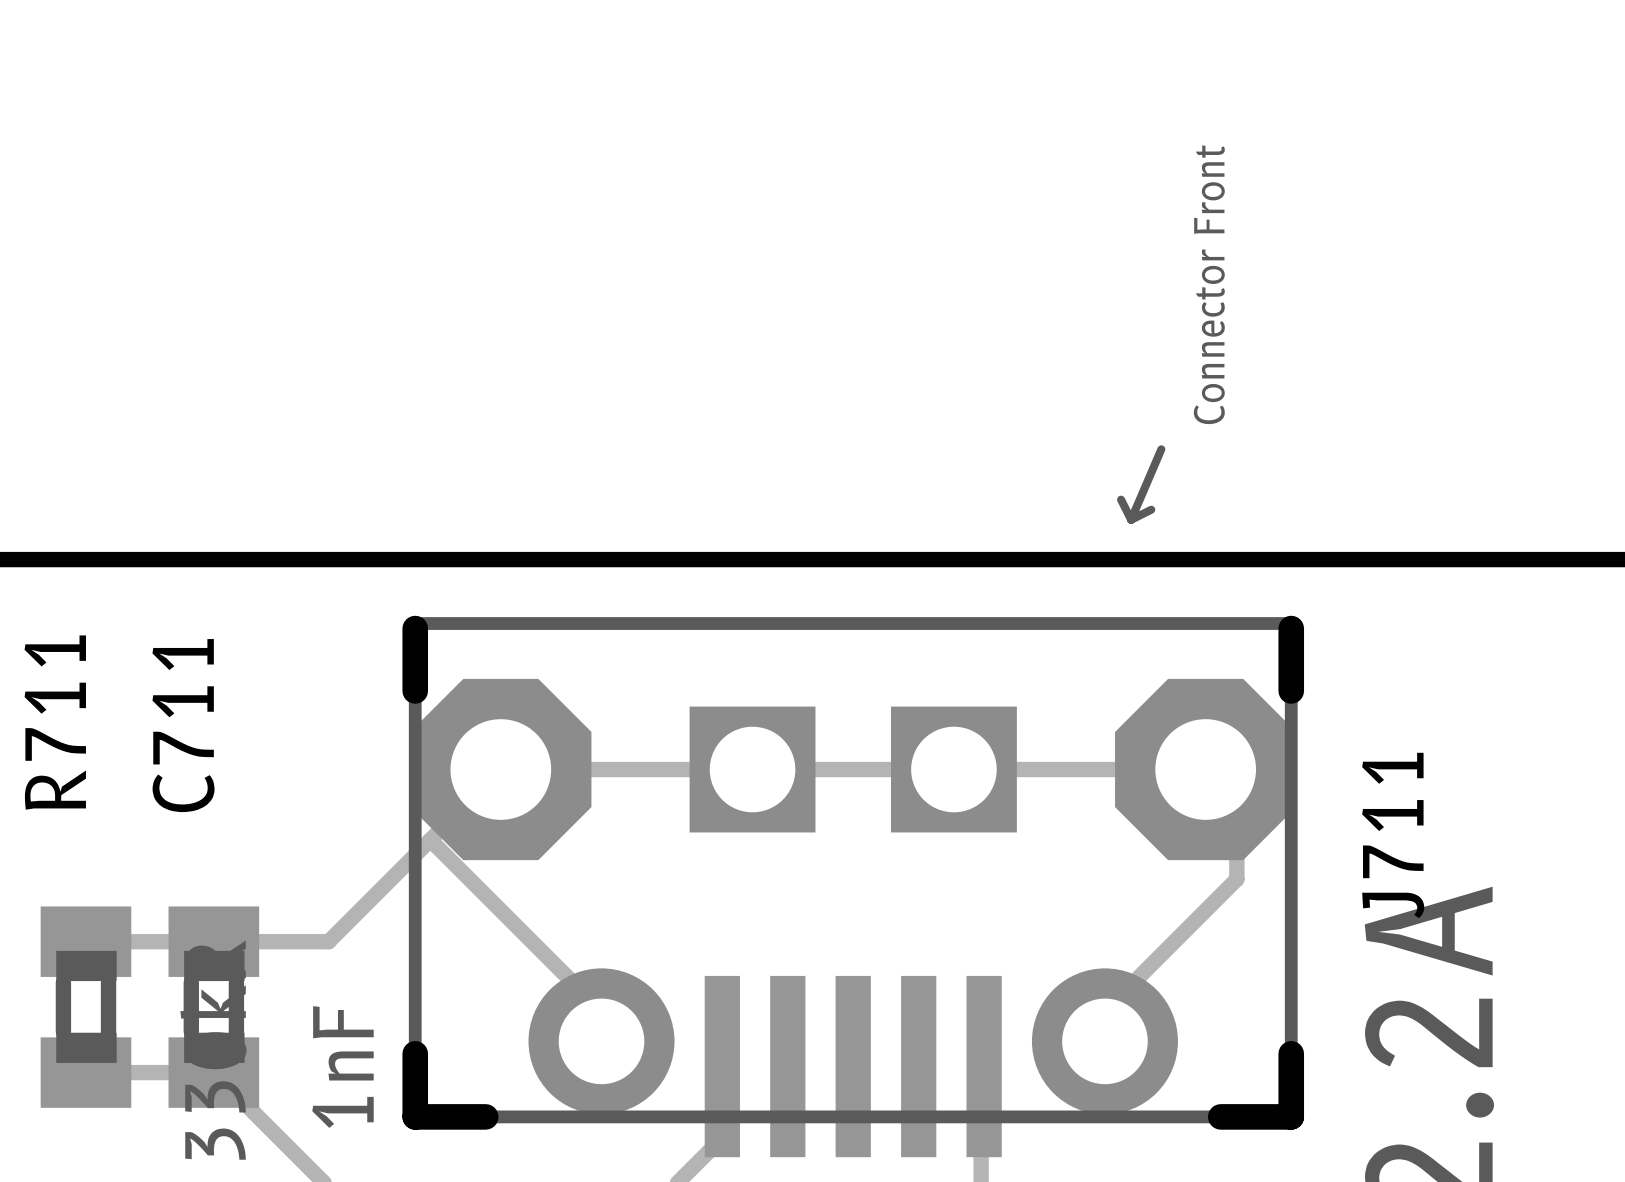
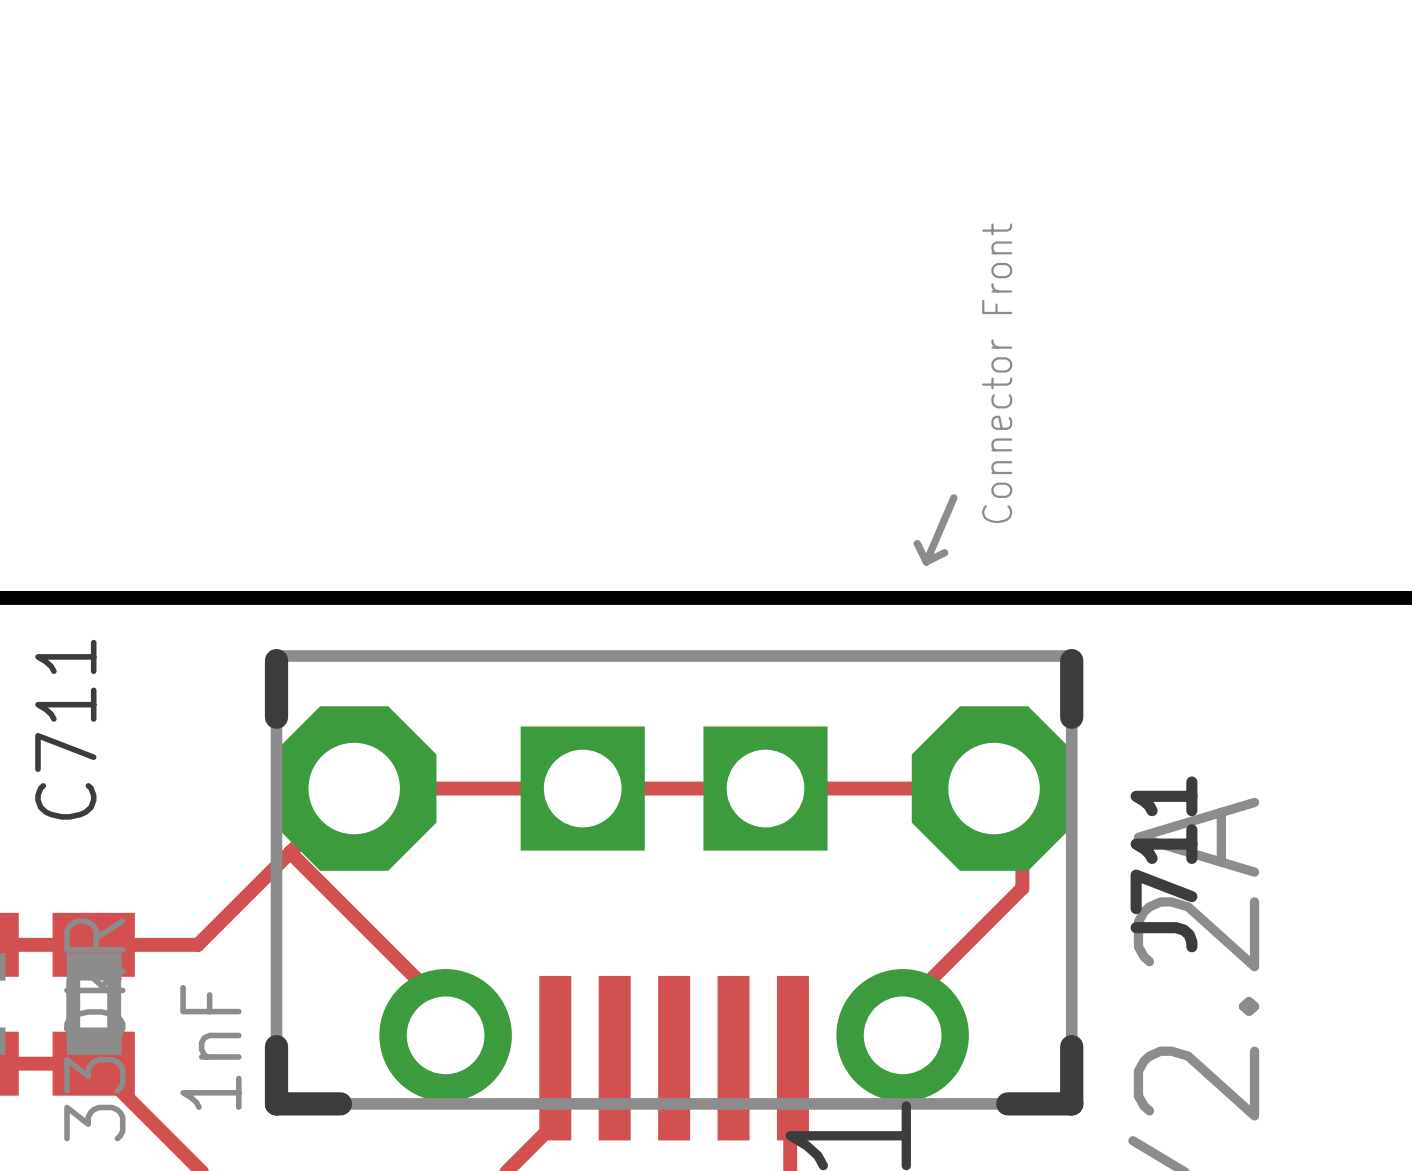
J711 footprint: [368, 445, 1338, 1158] -> [234, 494, 1114, 1141]

